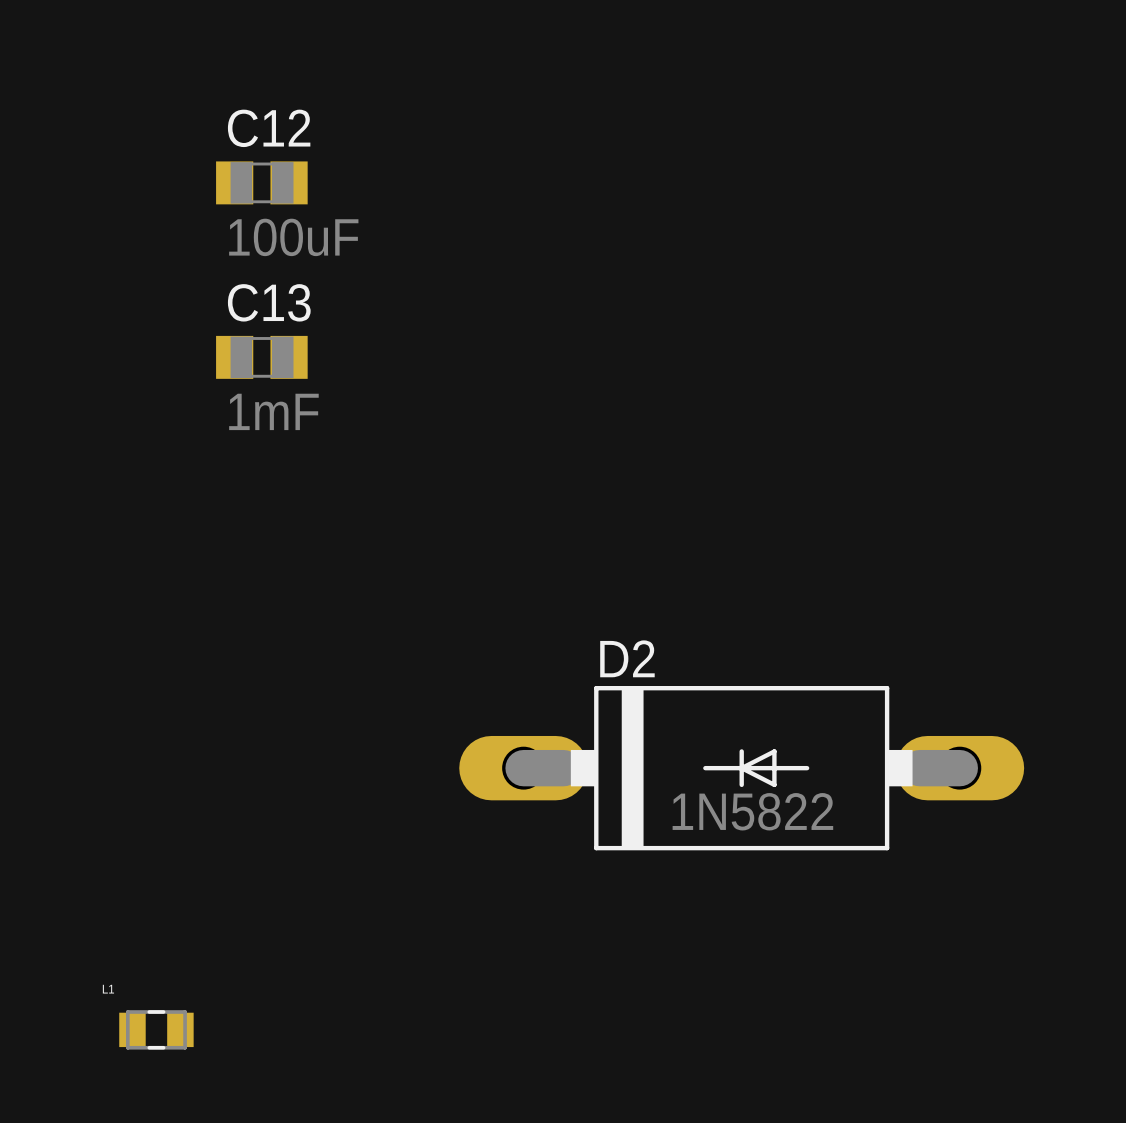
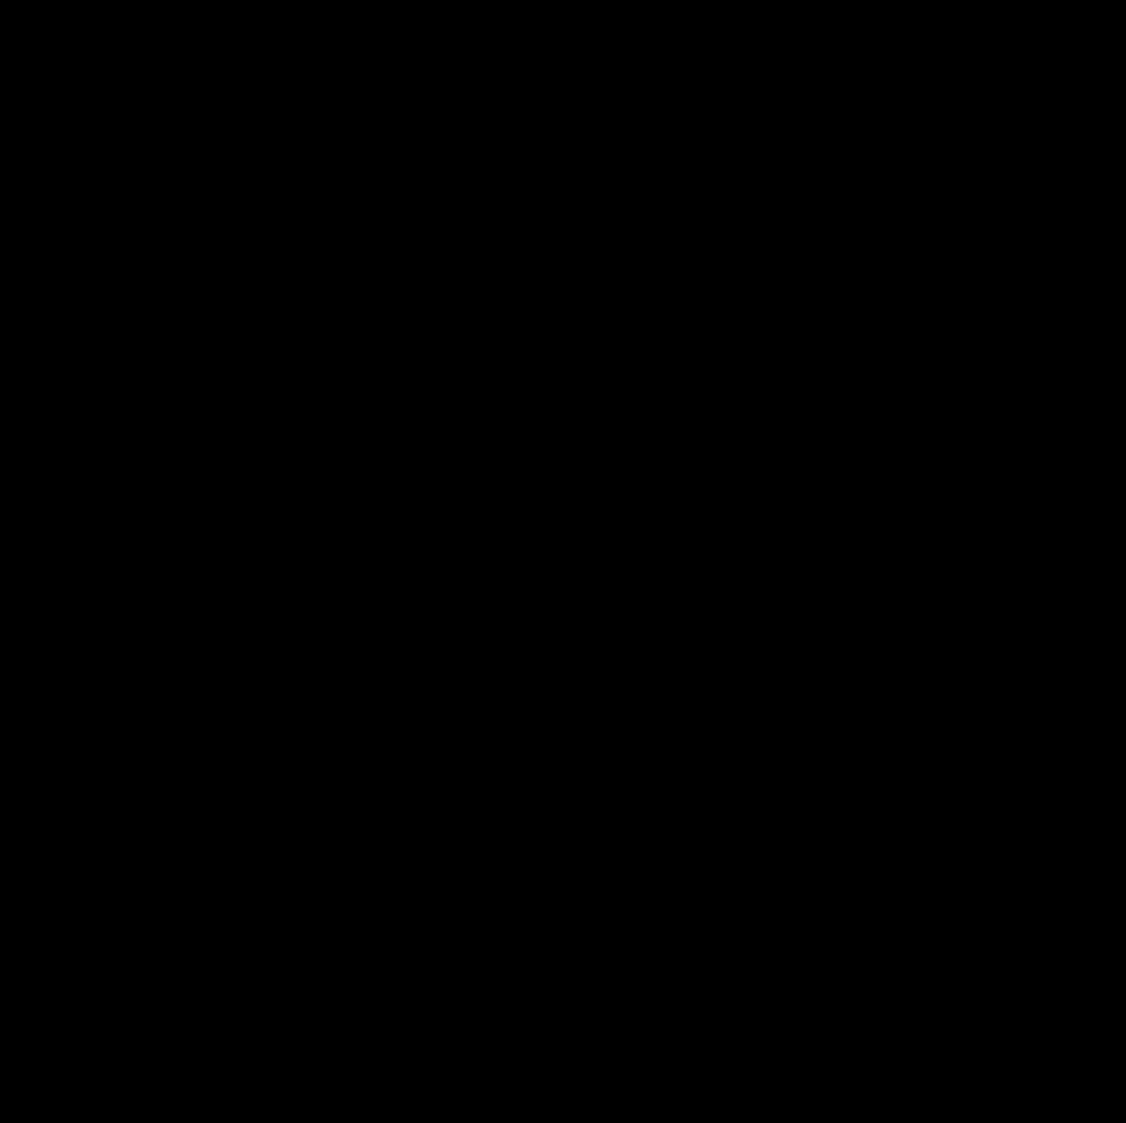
C12: 100uF (261, 182) -> none
C13: 1mF (261, 357) -> none
D2: 1N5822 (741, 768) -> none
L1: (156, 1029) -> none

